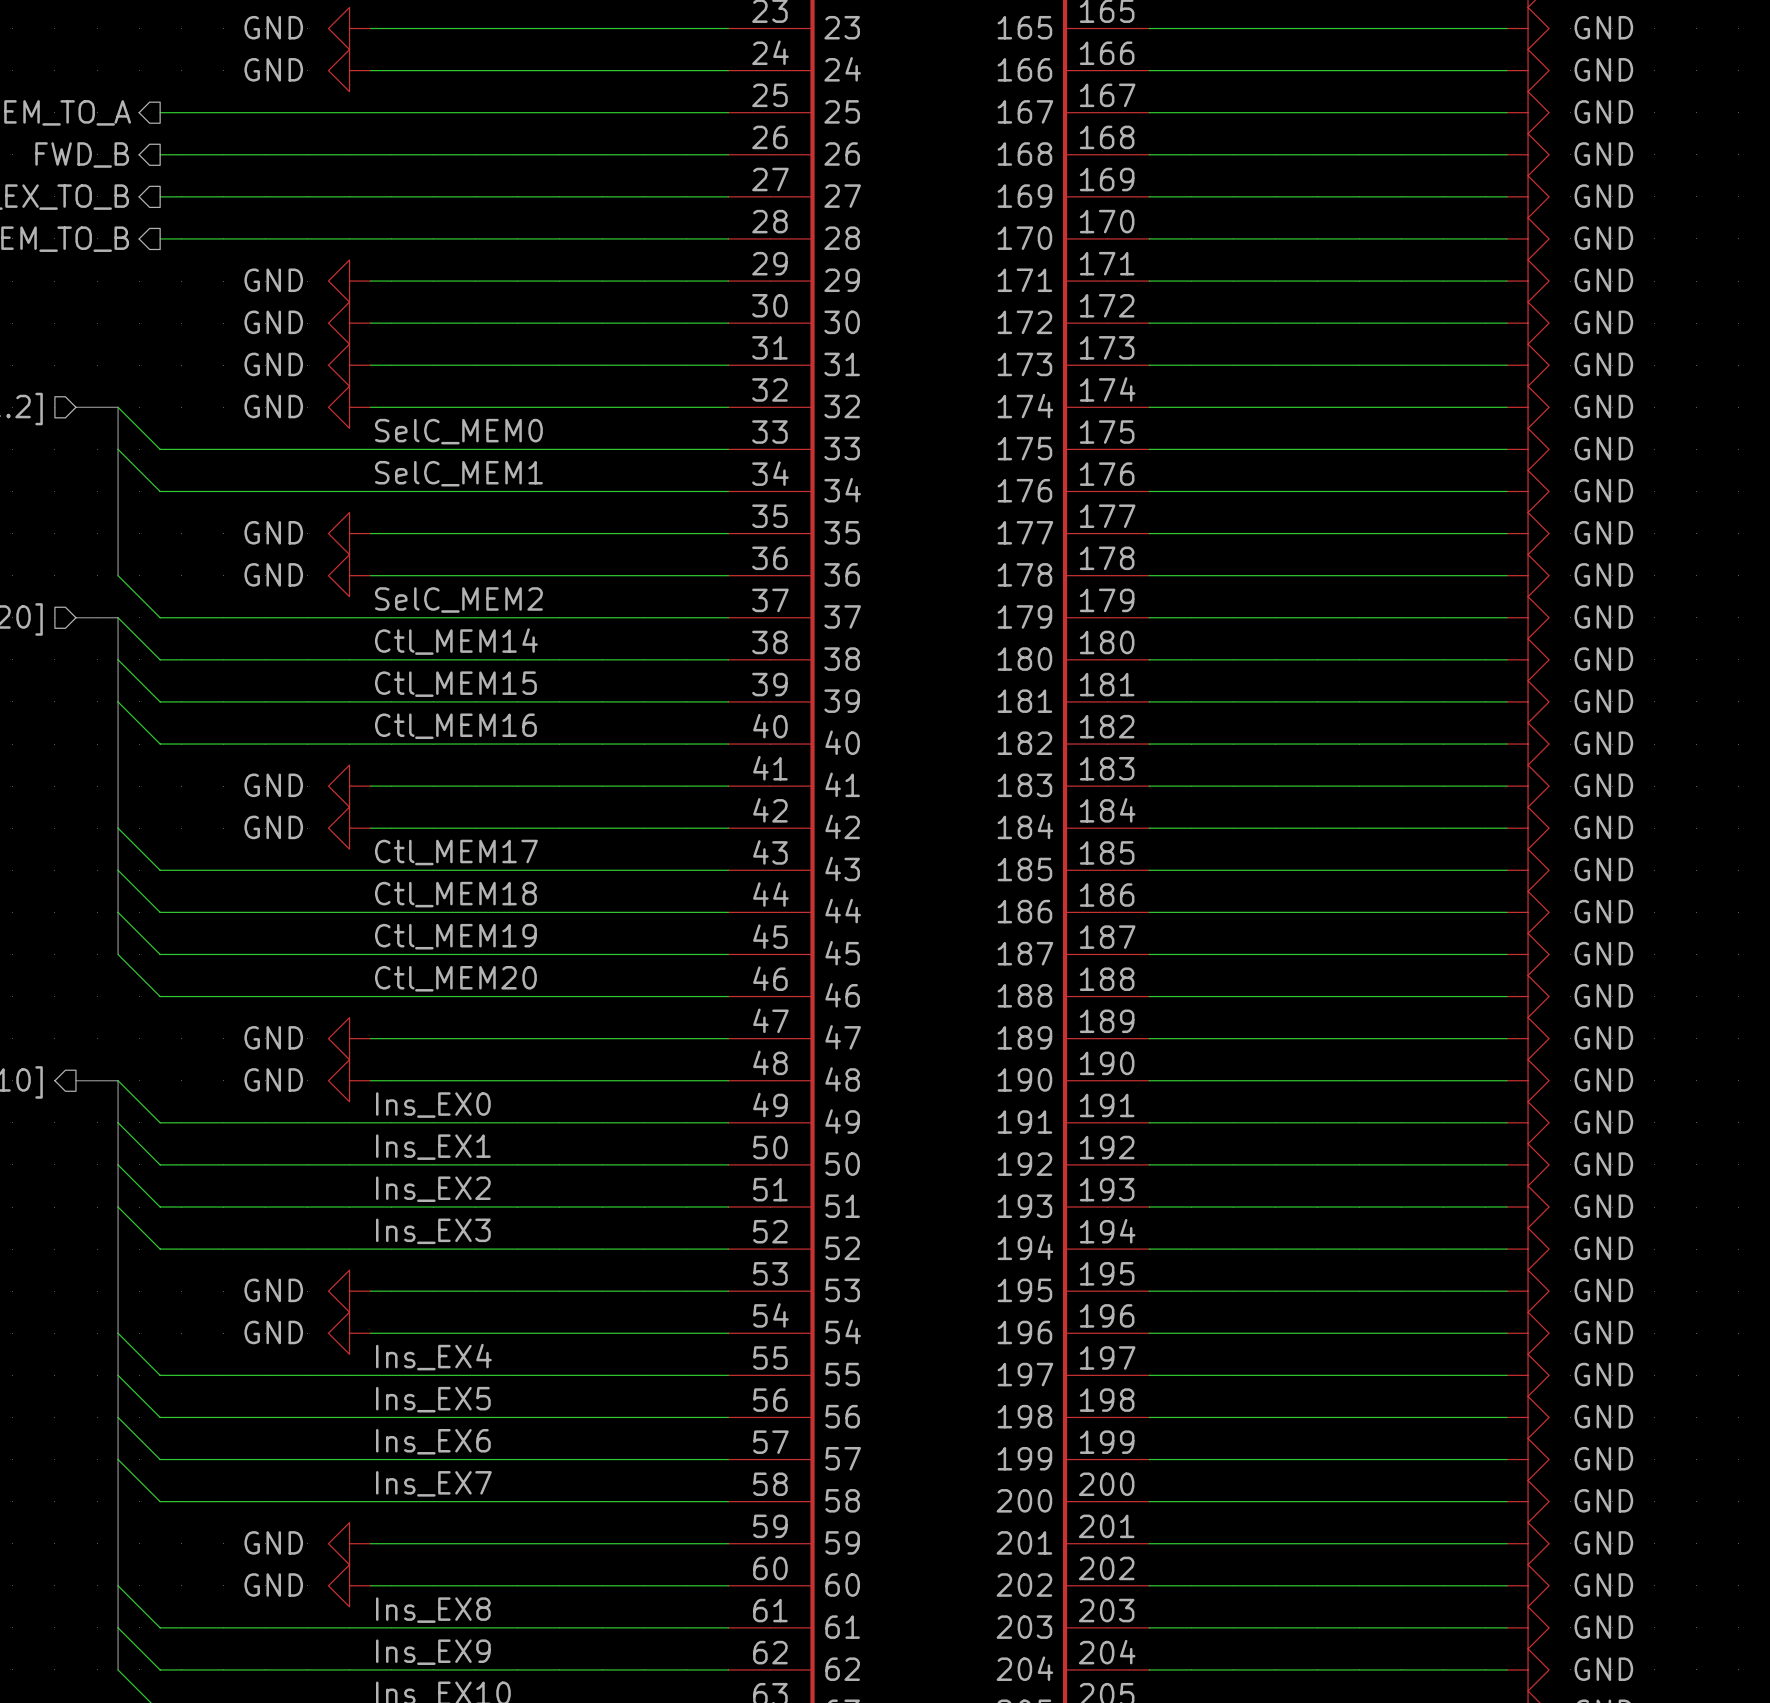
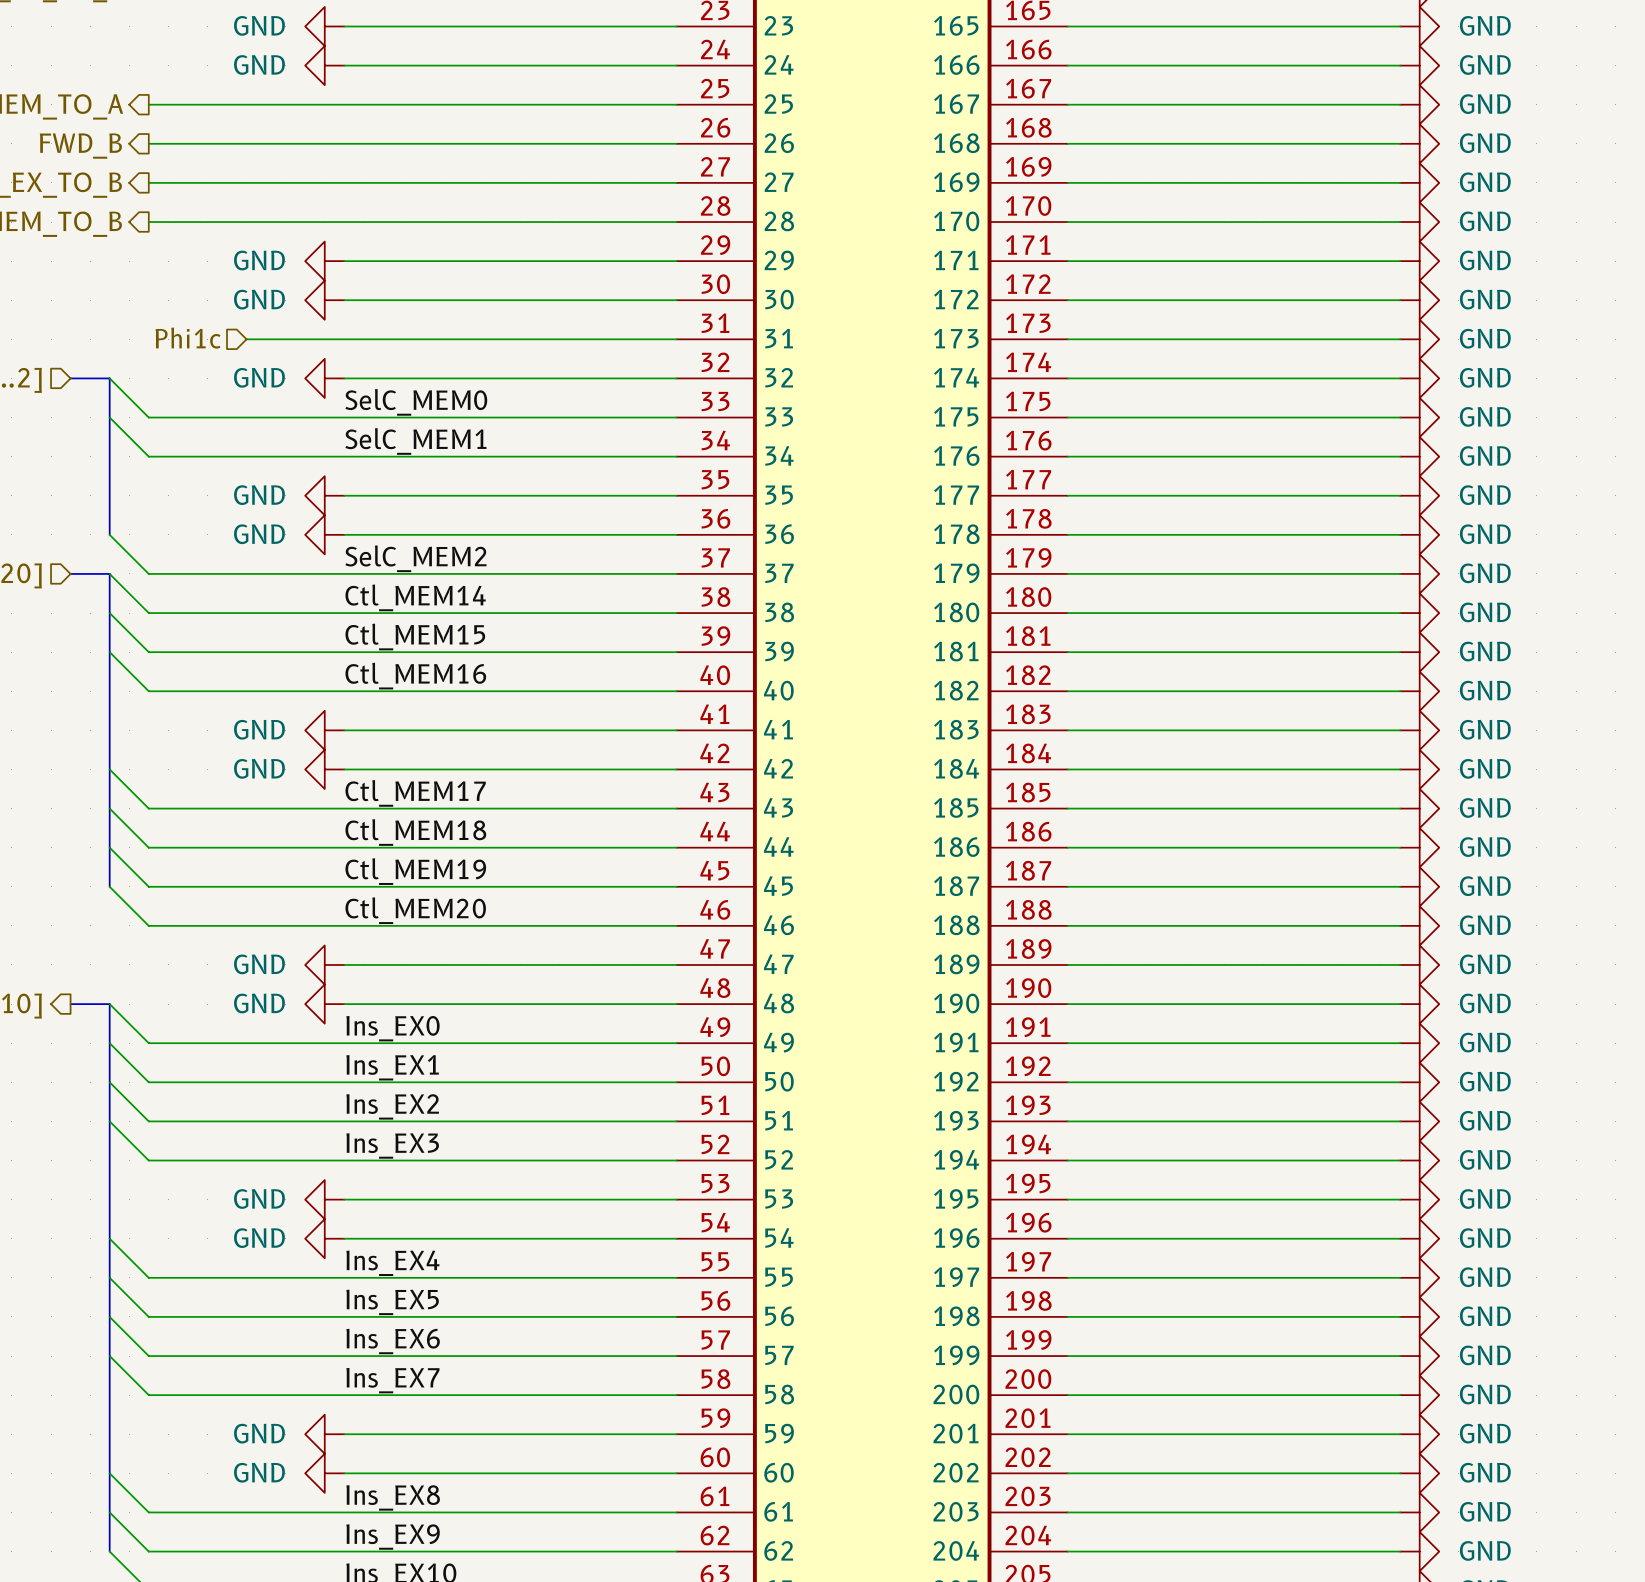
hierarchical label: none -> Phi1c (188, 338)
wire: none -> (246, 339) (344, 339)
power symbol: GND (349, 365) -> none

